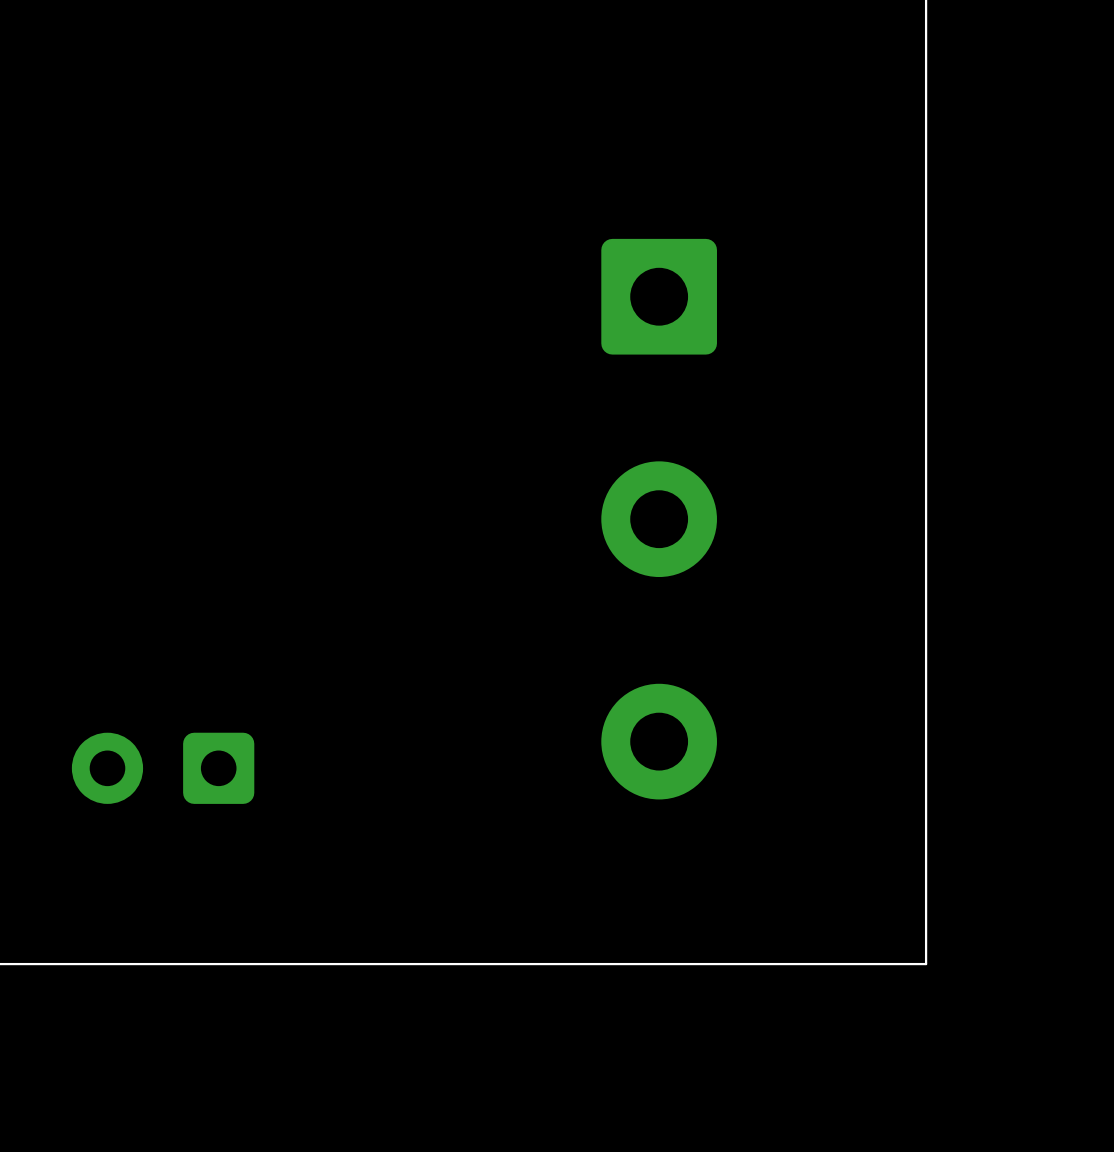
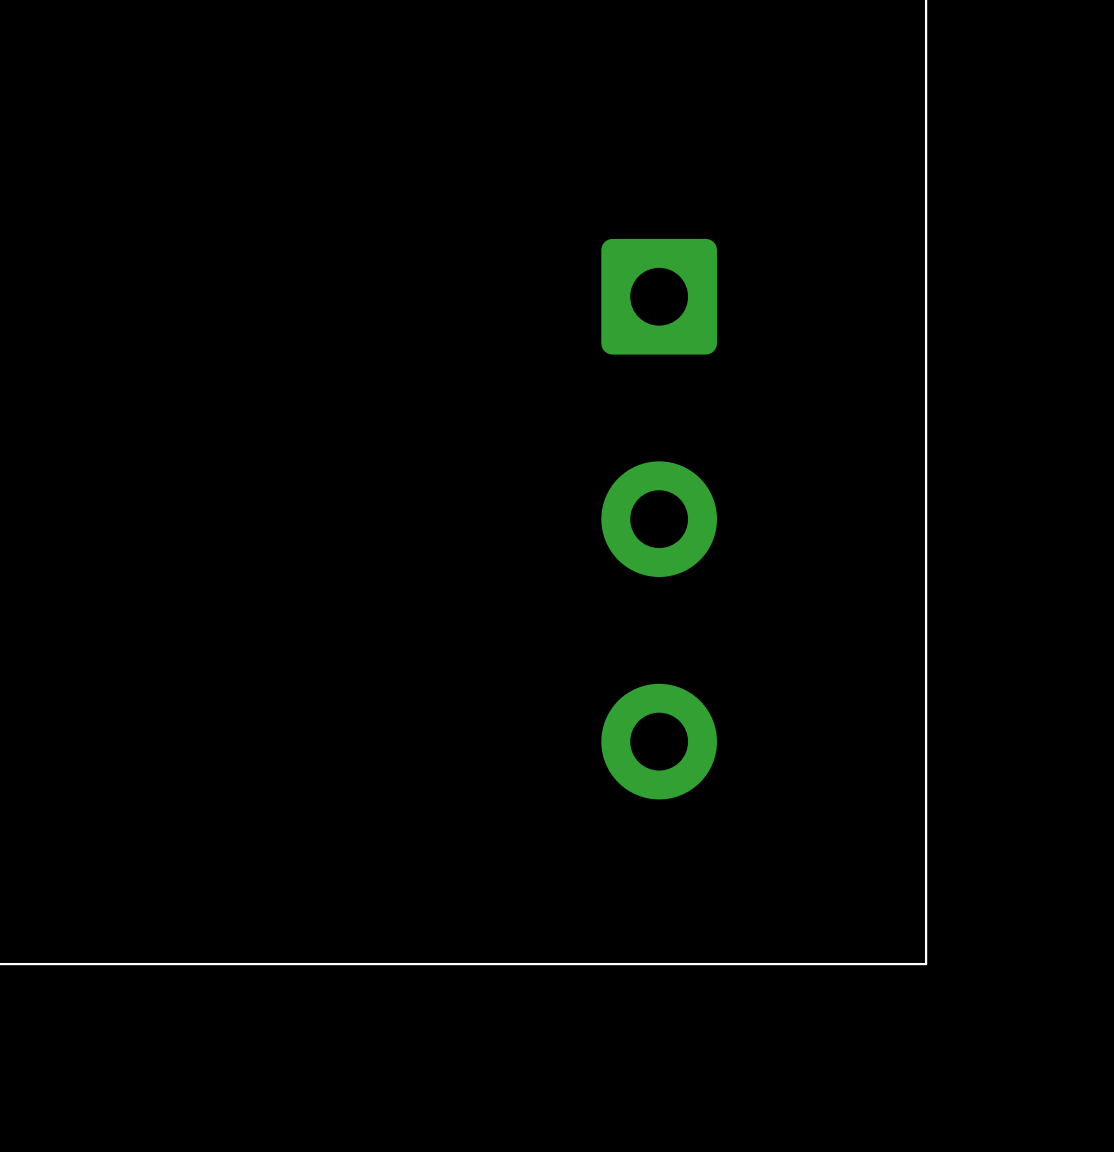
part: (163, 768) -> none

